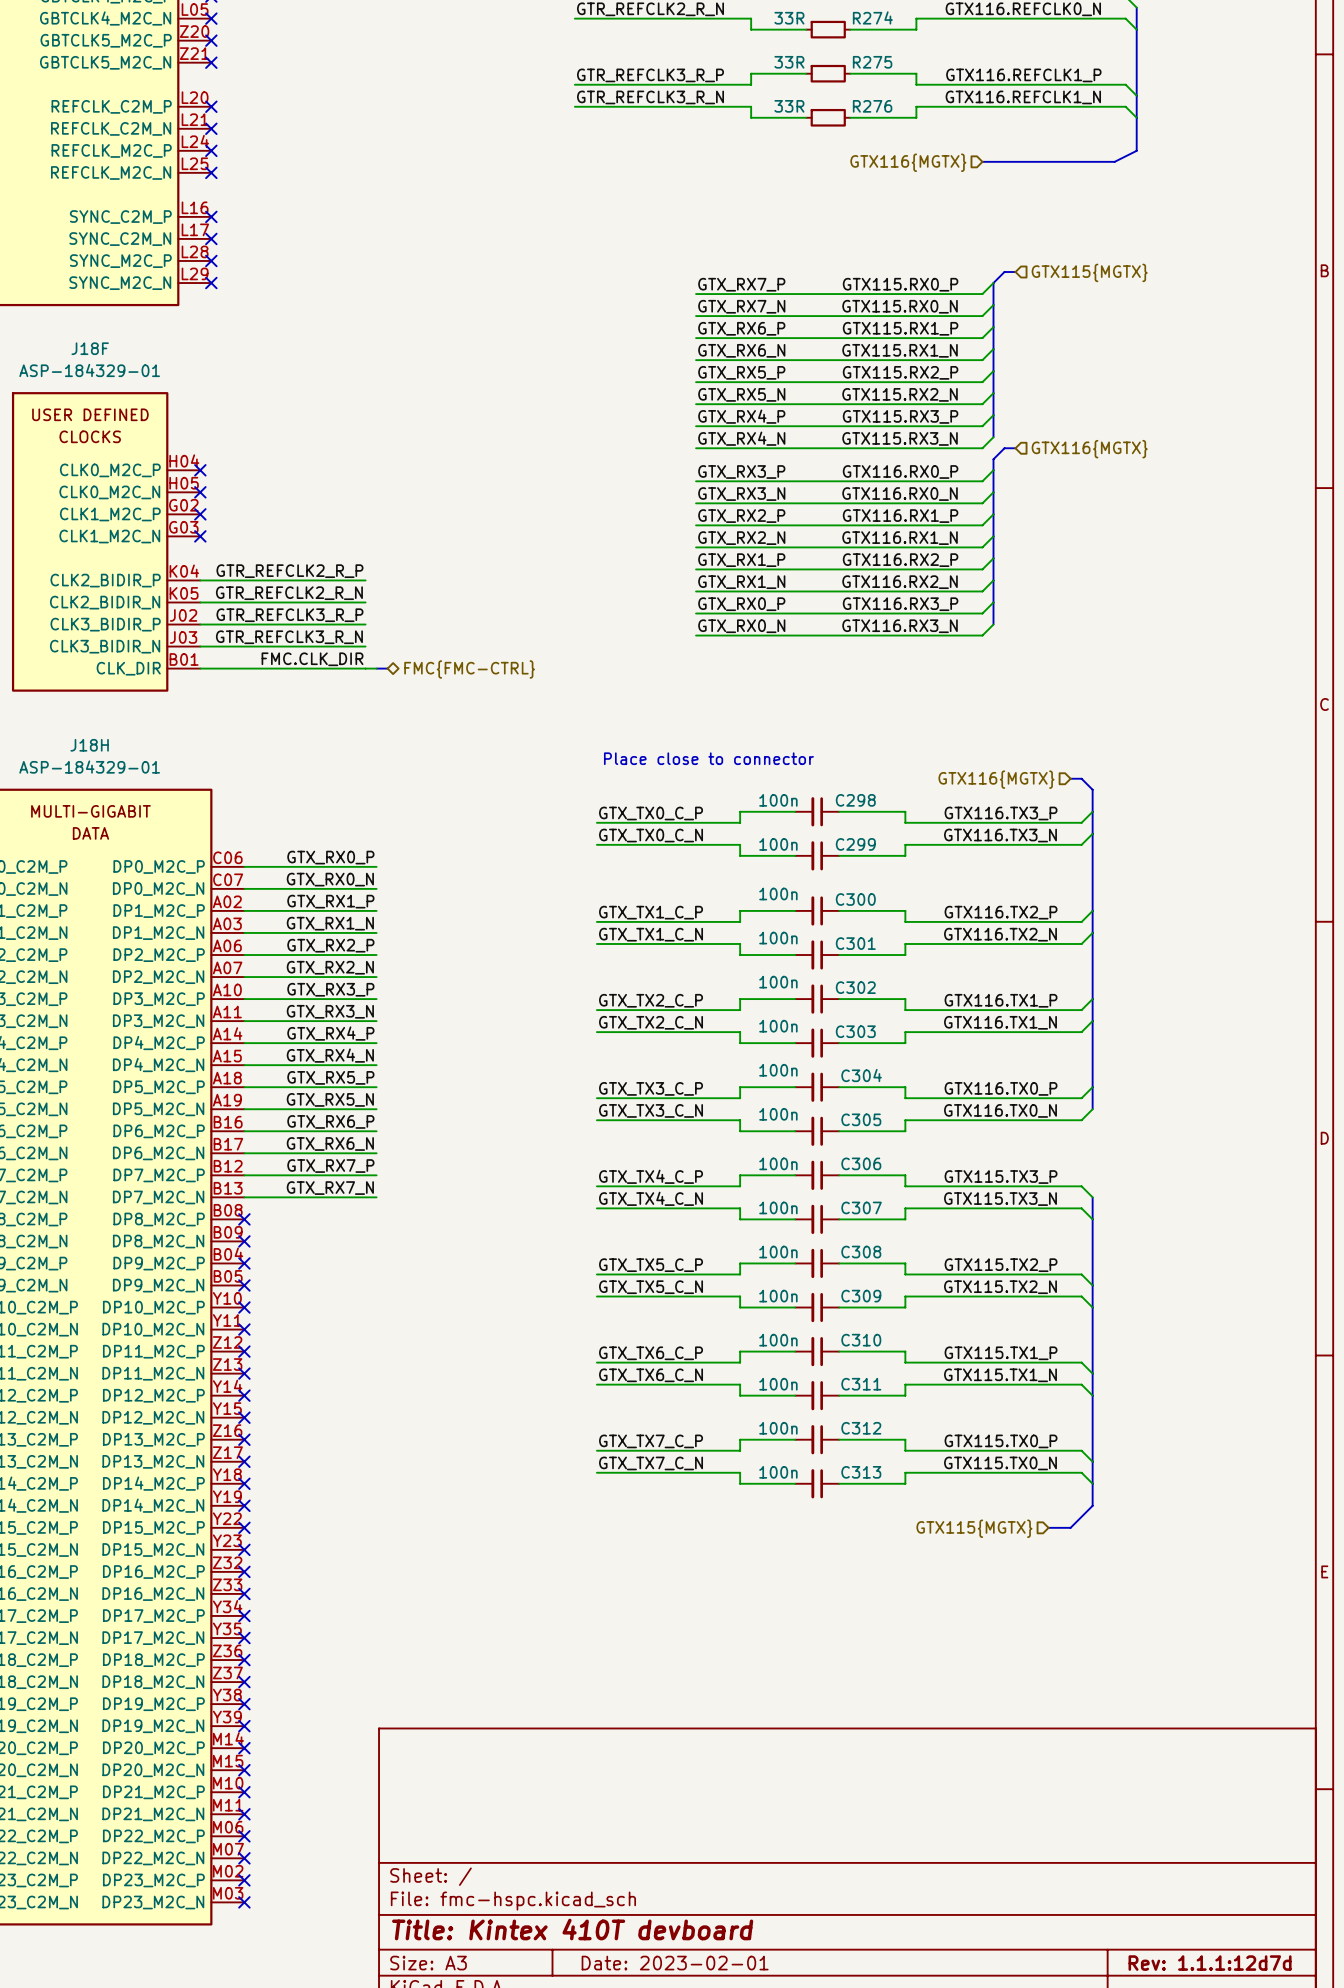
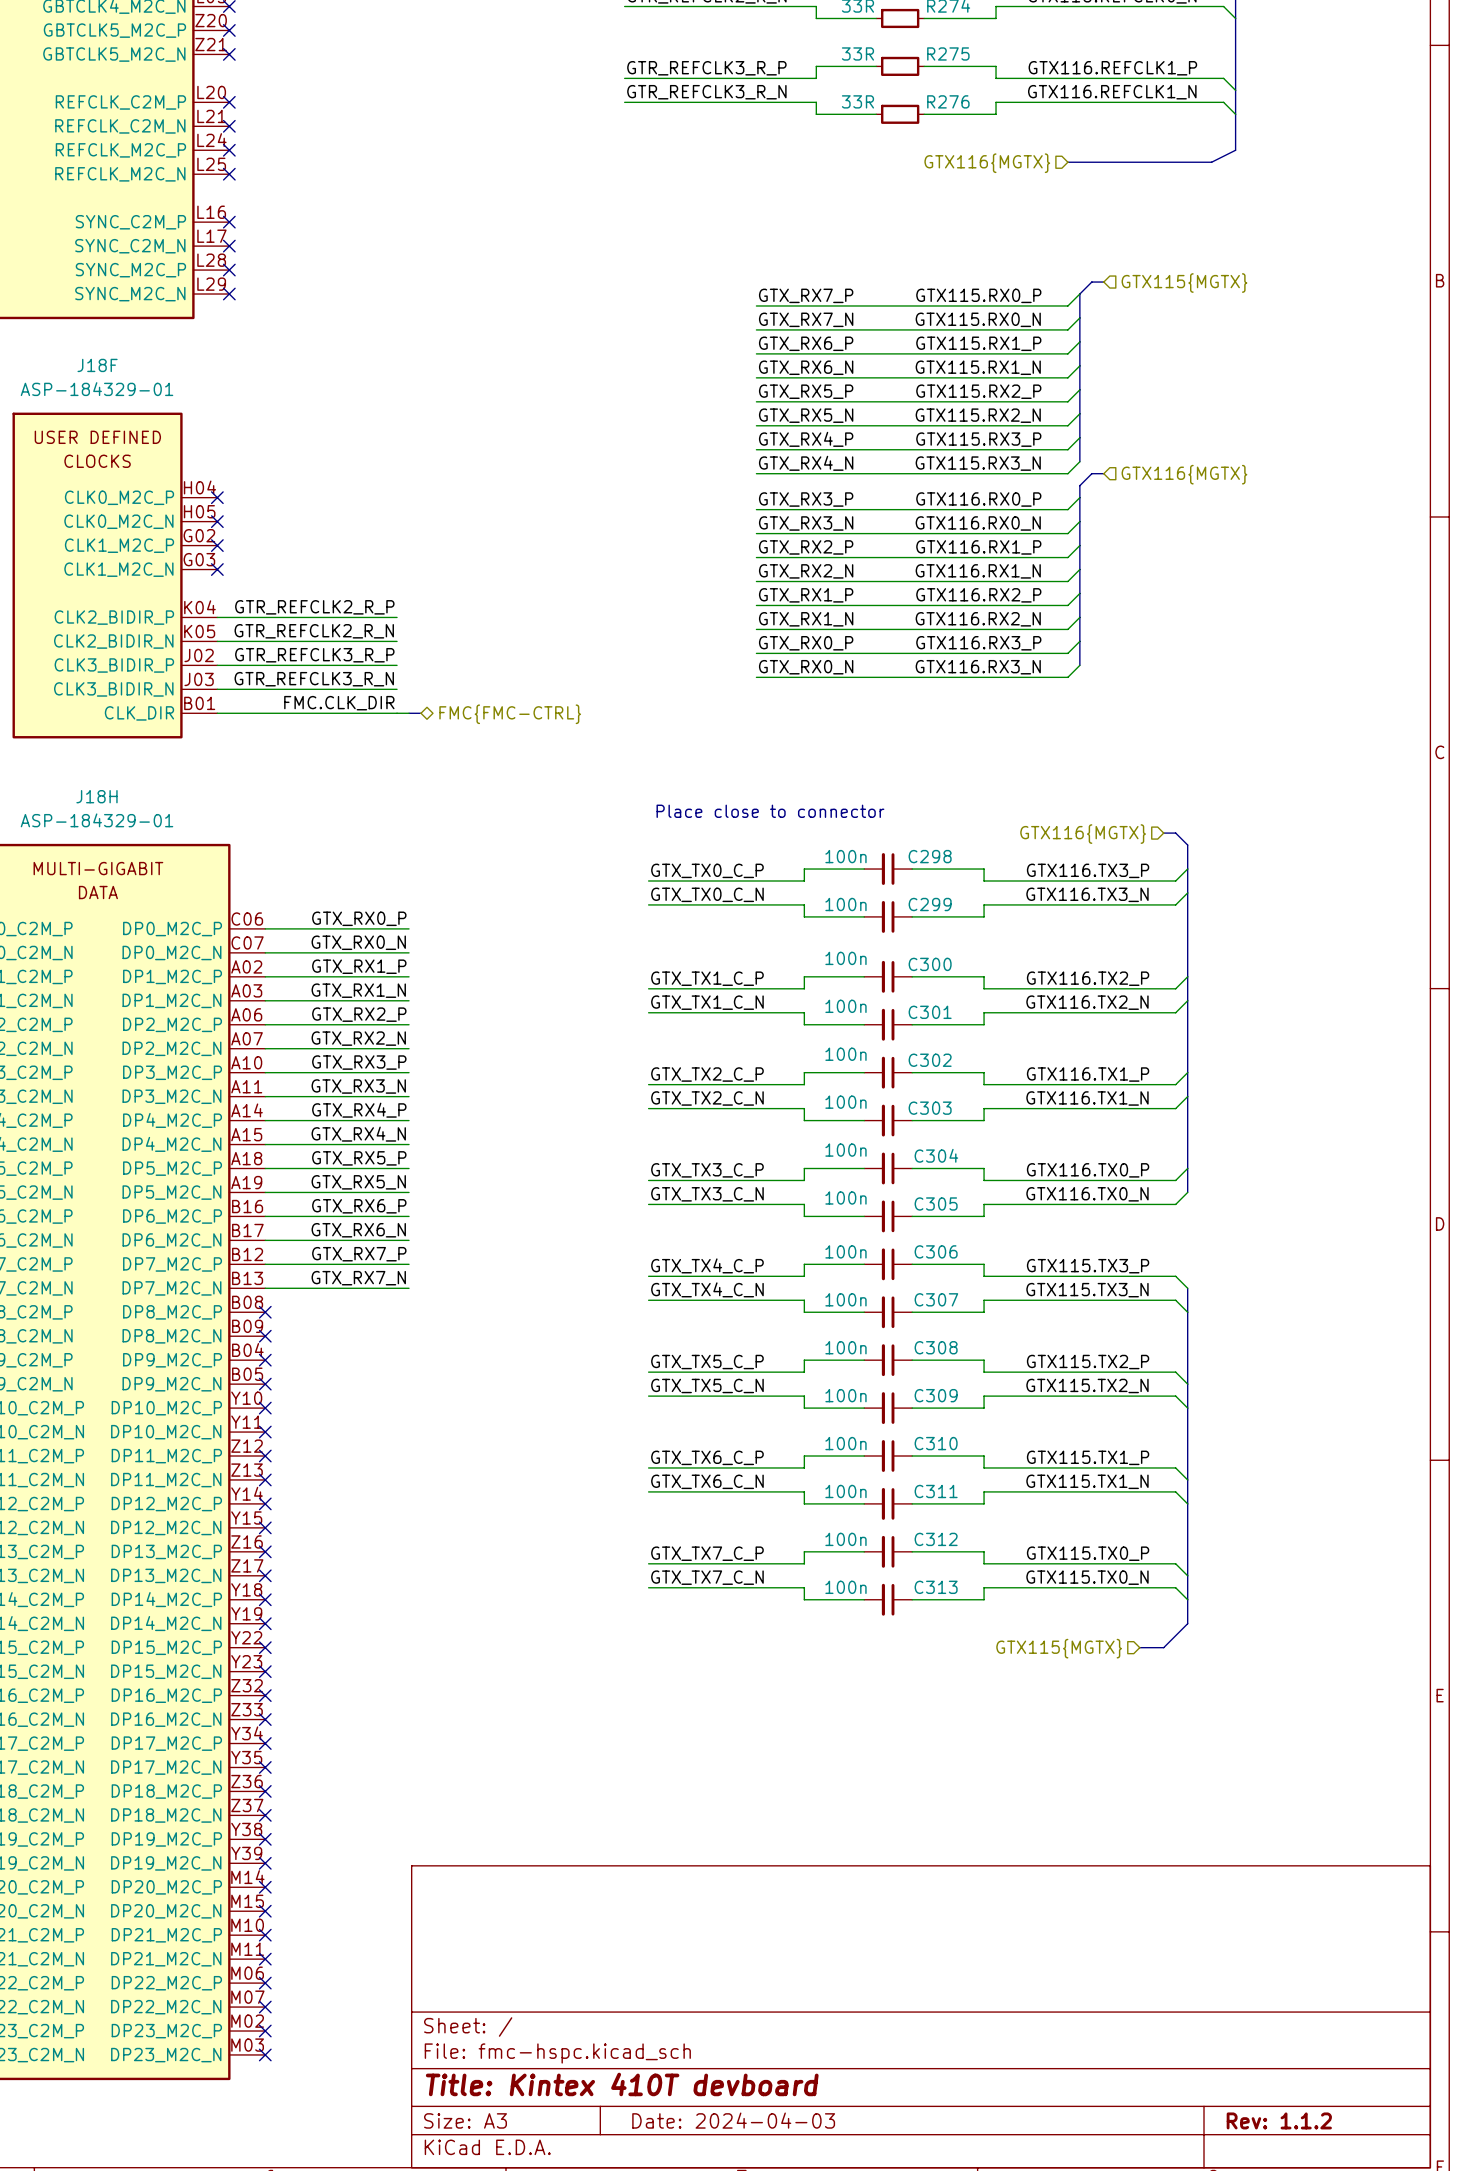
title block: Date: 2023-02-01 (675, 1963) -> Date: 2024-04-03 (733, 2120)
title block: Rev: 1.1.1:12d7d (1210, 1963) -> Rev: 1.1.2 (1279, 2120)

